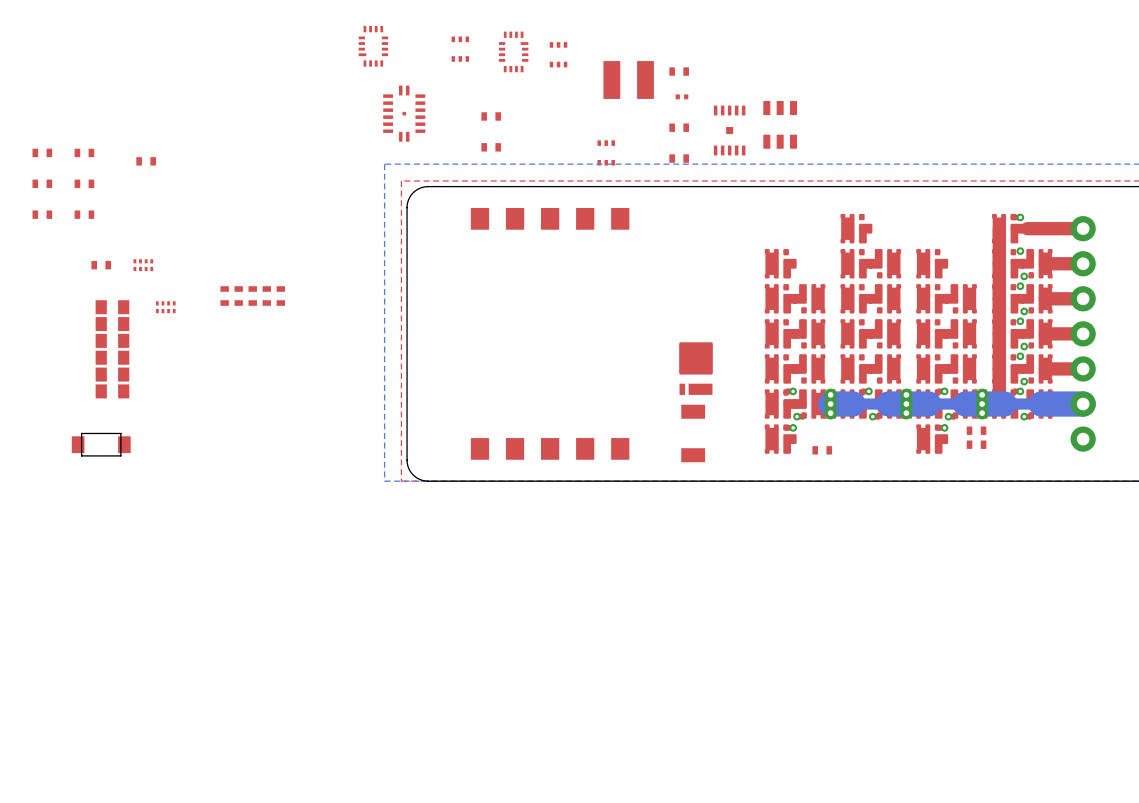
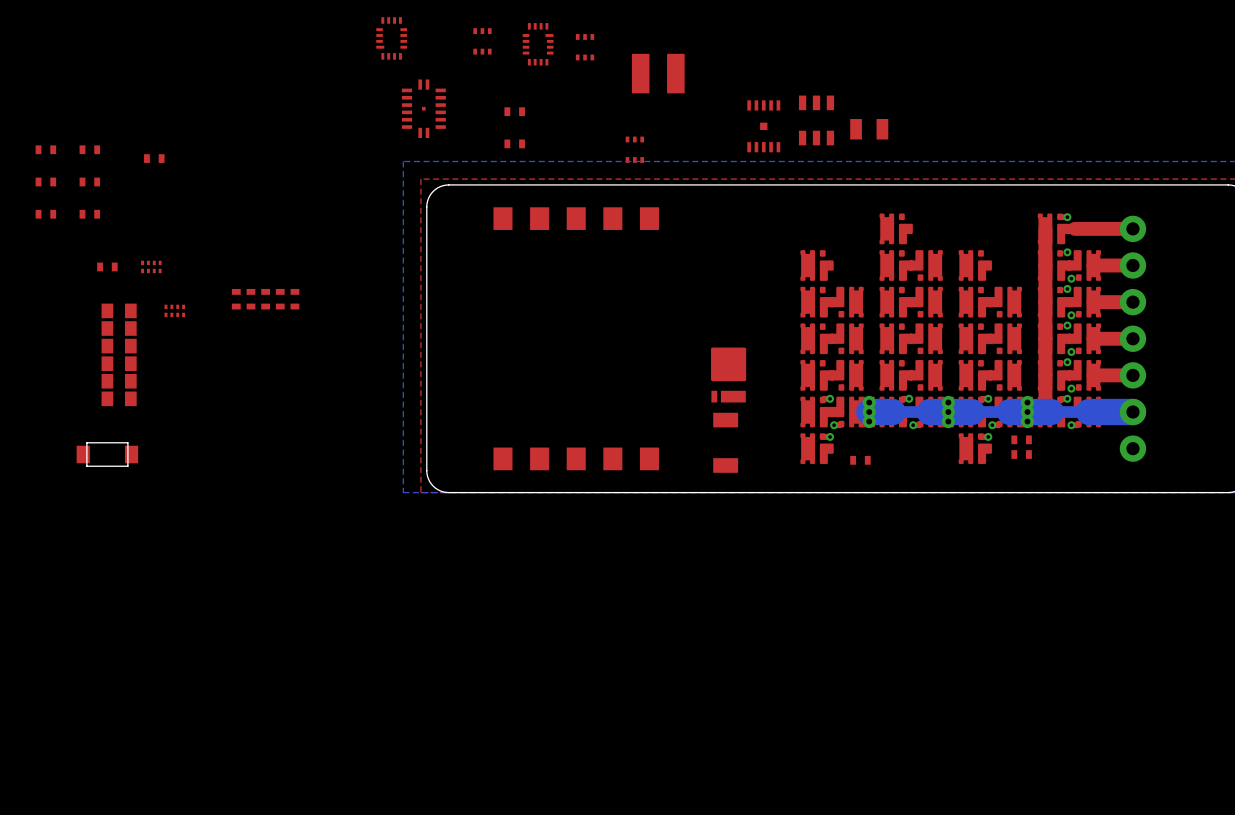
part: (679, 71) -> none
part: (681, 96) -> none
part: (679, 127) -> none
part: none -> (869, 129)
part: (679, 158) -> none

